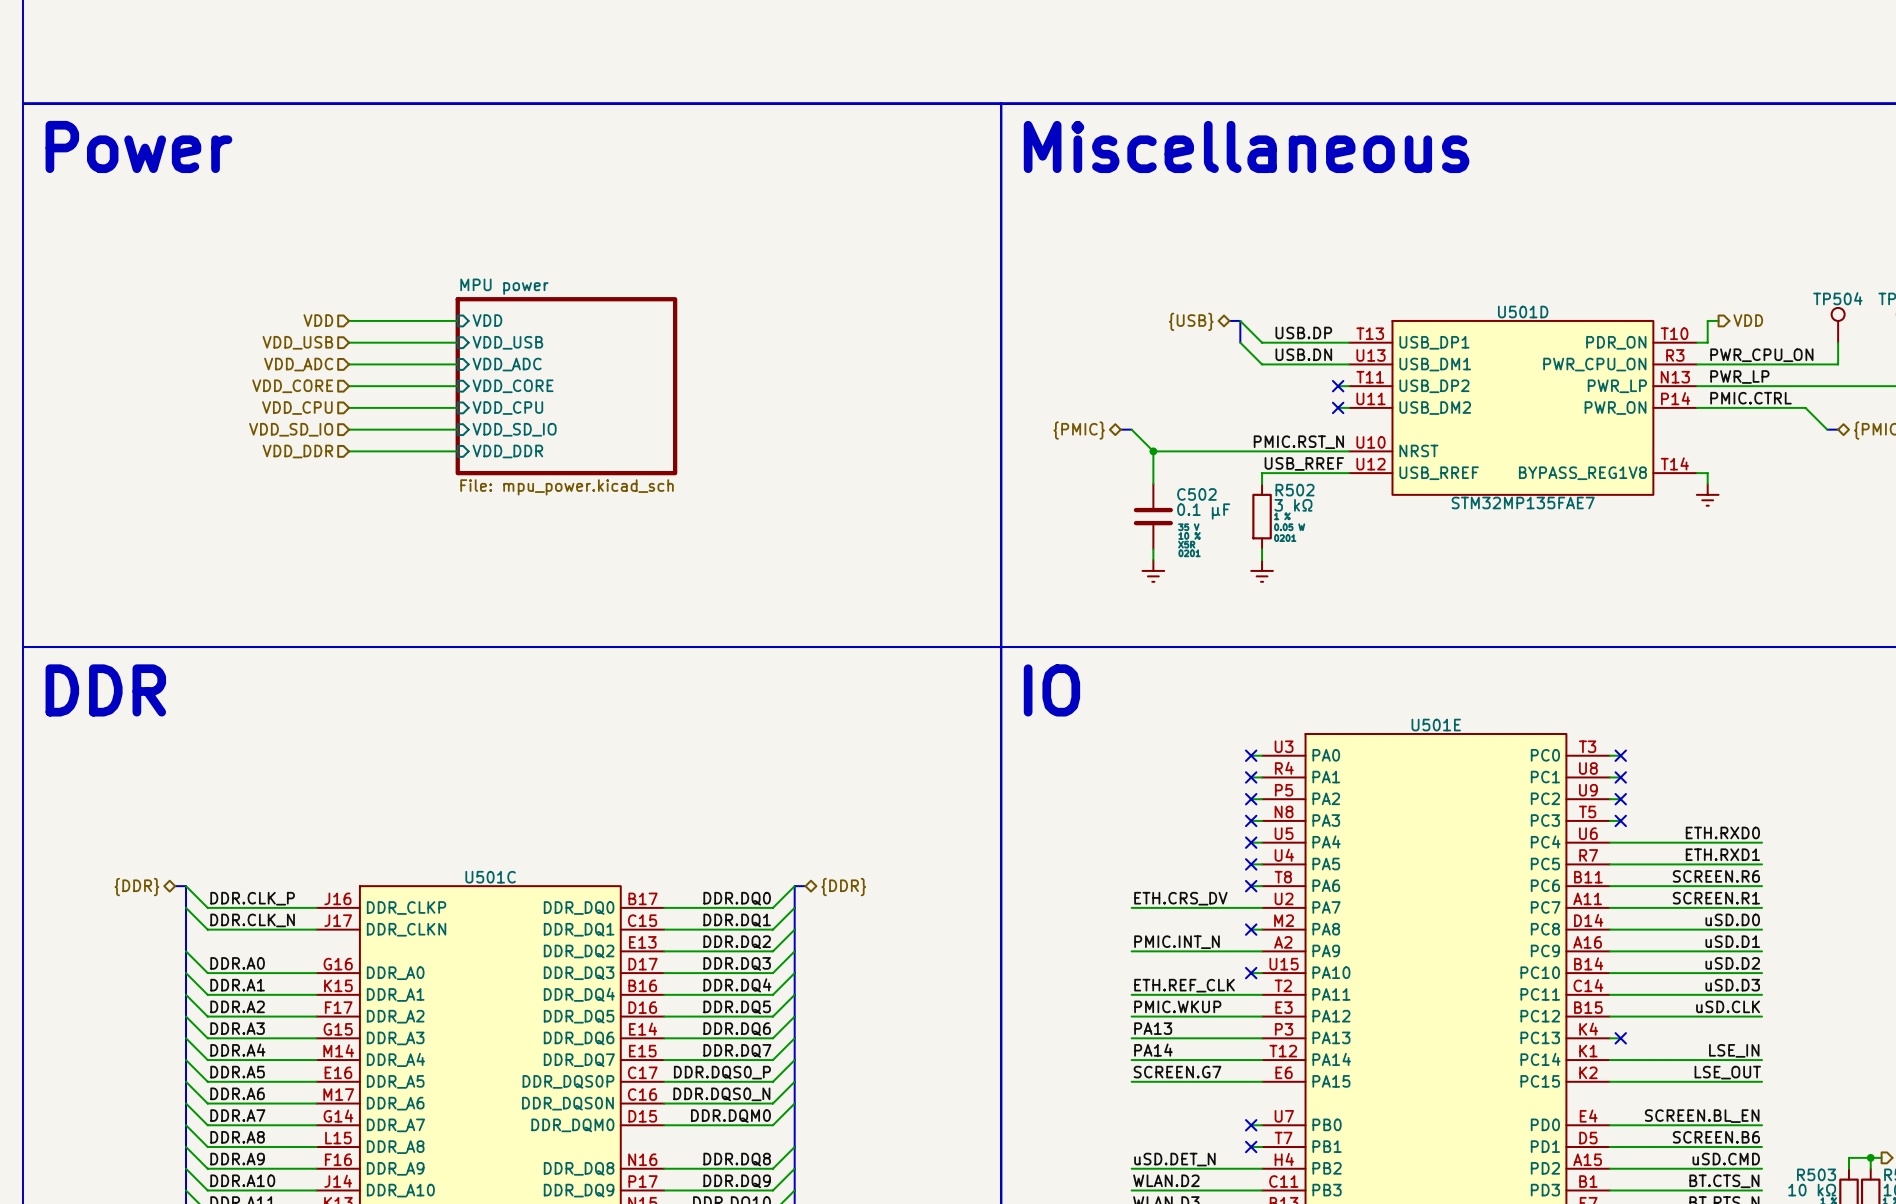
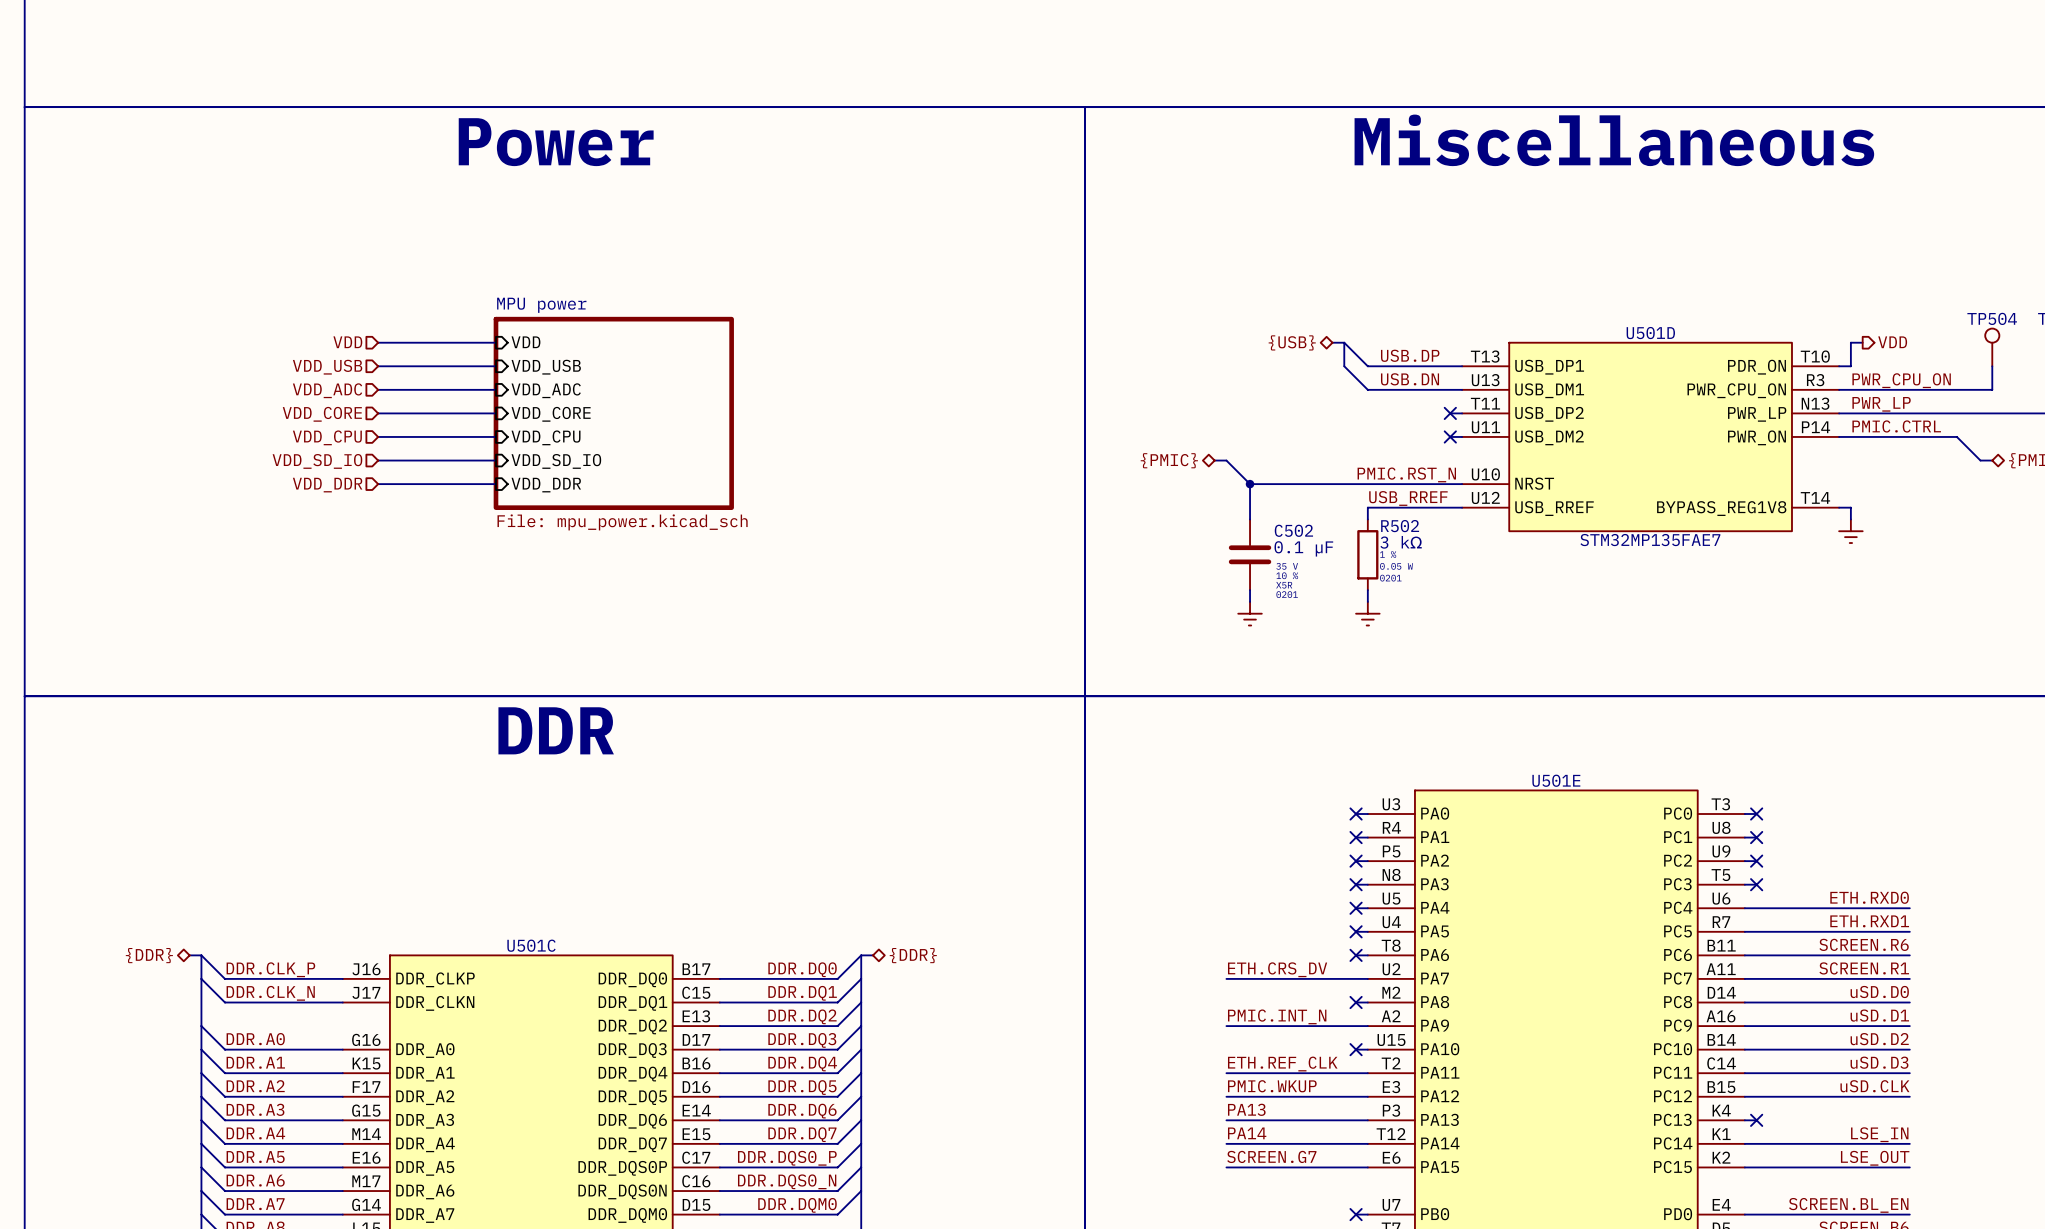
text: none -> Power (556, 142)
text: none -> Miscellaneous (1614, 140)
text: Power (138, 146) -> none
text: Miscellaneous (1246, 146) -> none
text: none -> DDR (556, 730)
text: DDR (105, 690) -> none
text: IO (1051, 690) -> none

